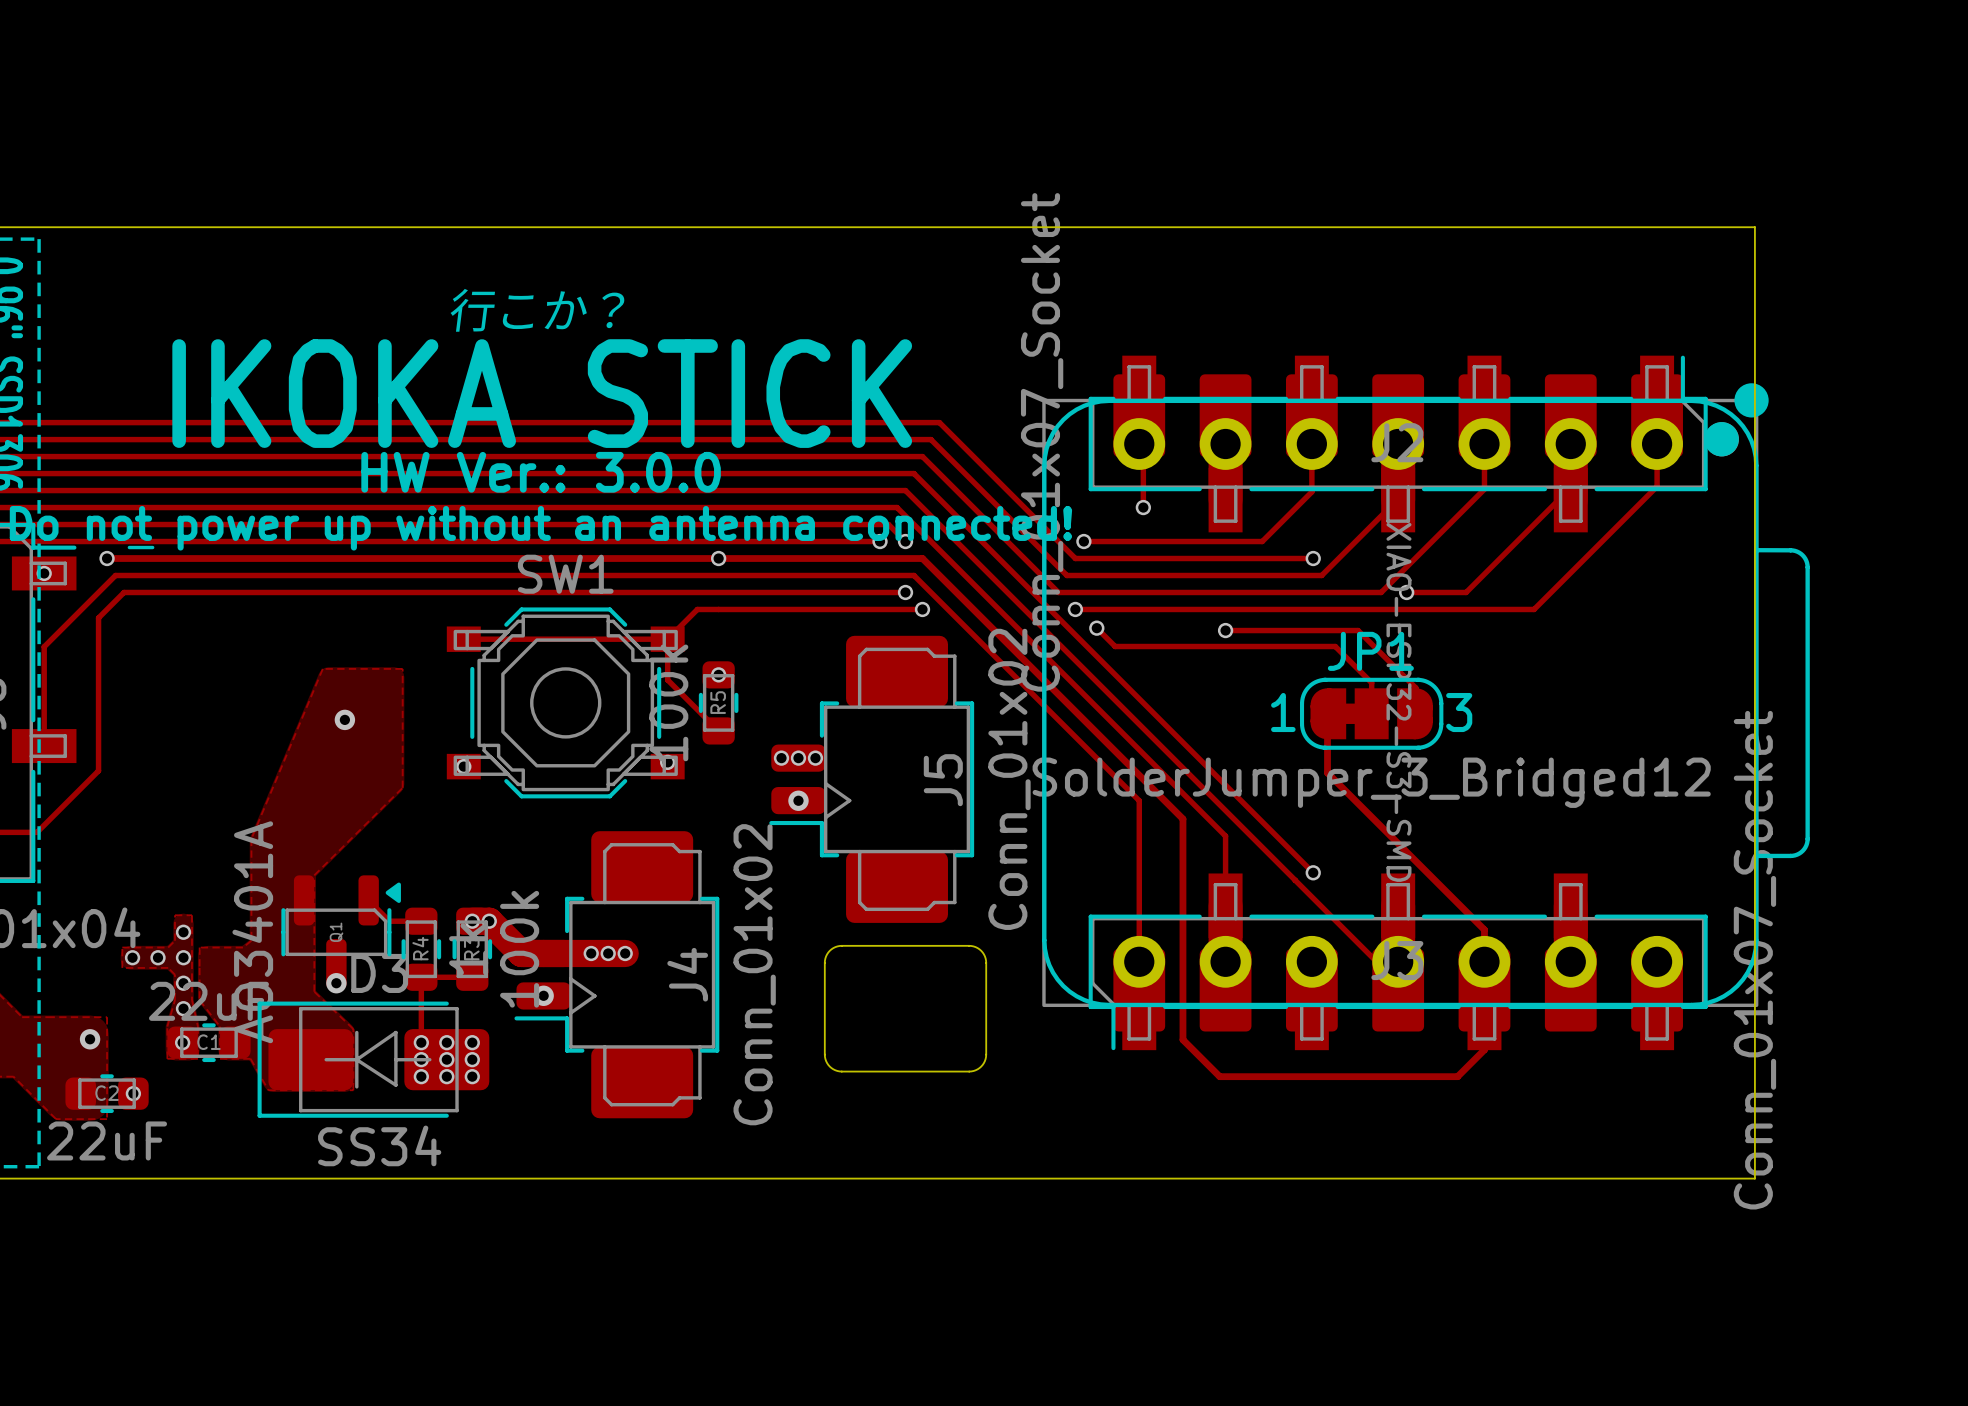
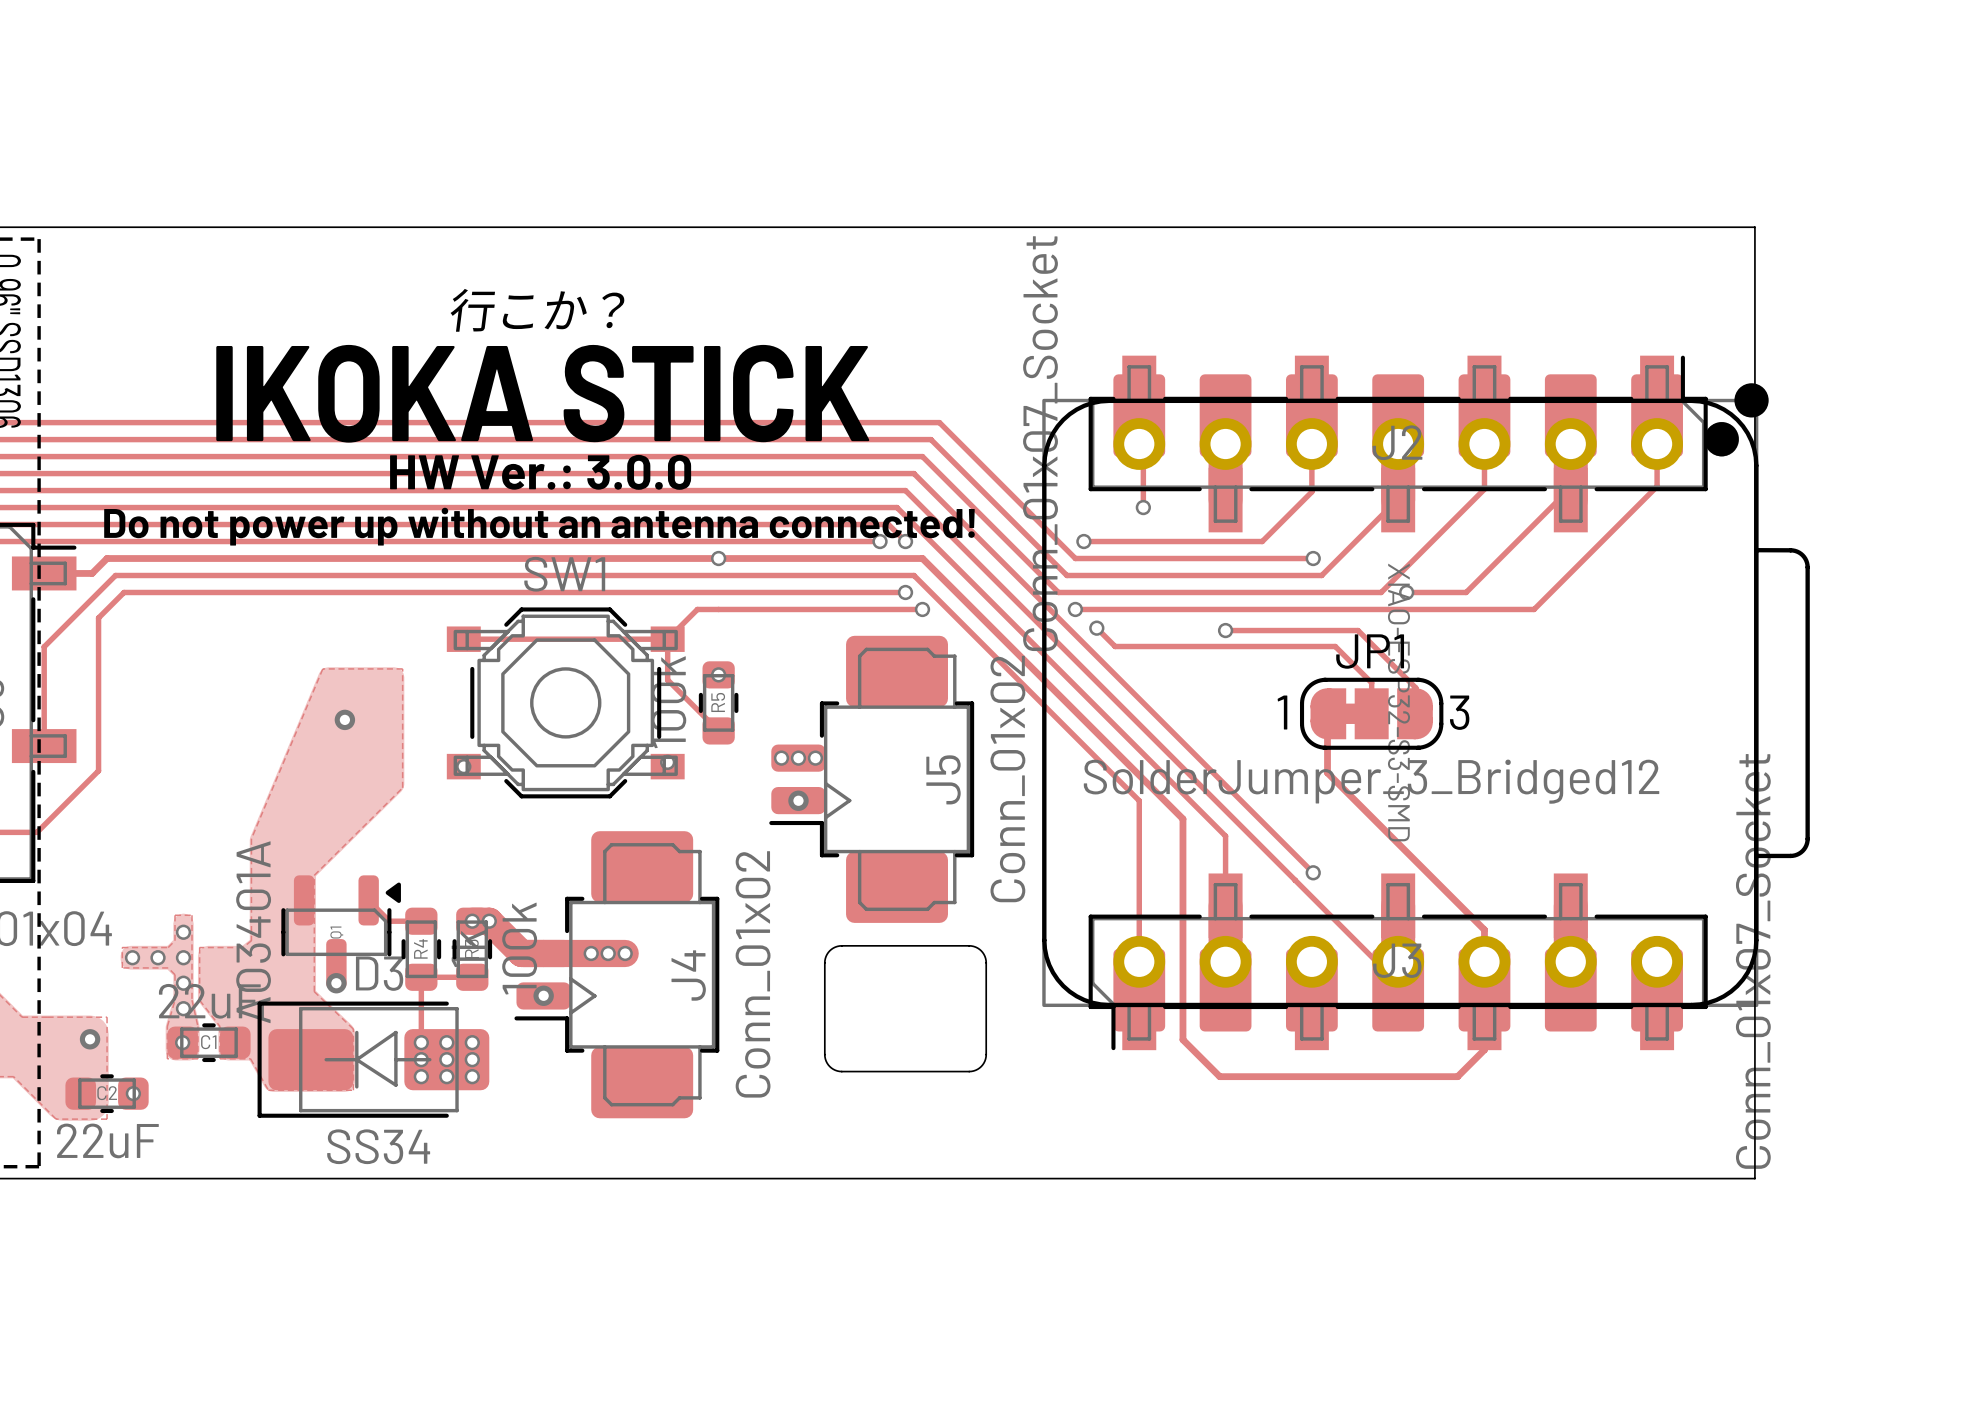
text: - (141, 547) -> none
track: none -> (107, 558) (92, 573) (44, 573)
via: (107, 558) -> none
via: (44, 573) -> none

